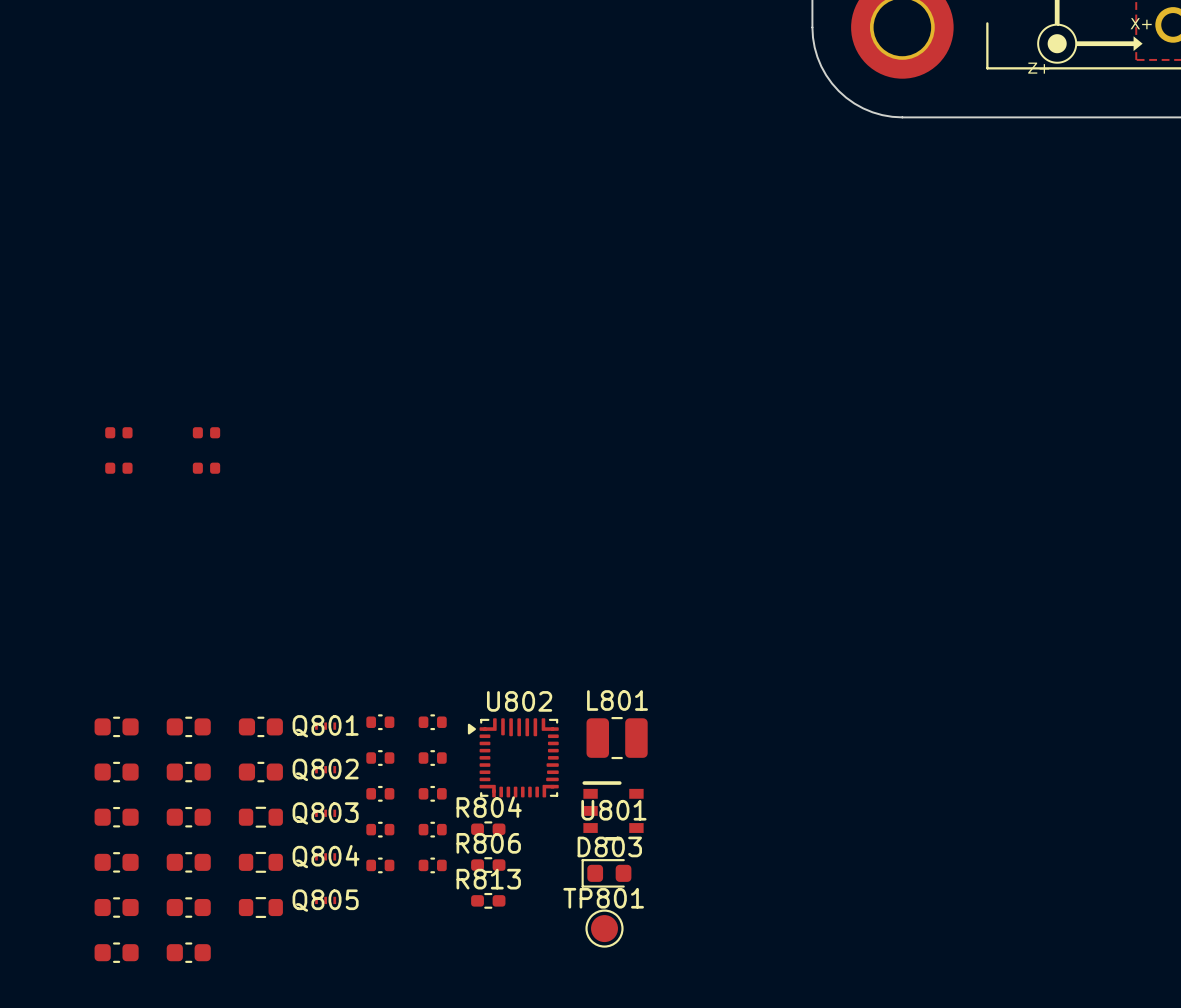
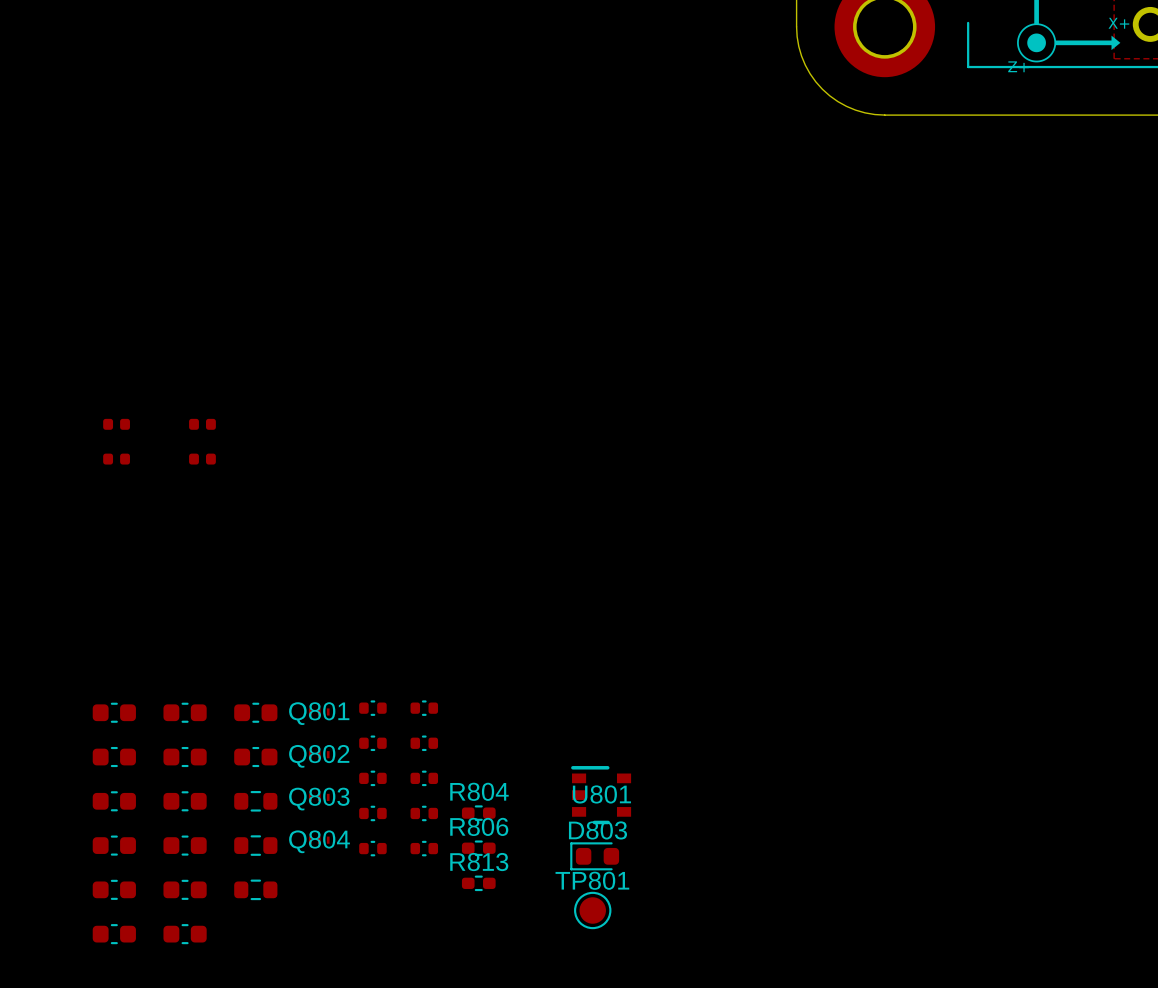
L801: (617, 738) -> none
U802: (513, 757) -> none
Q805: (325, 900) -> none

